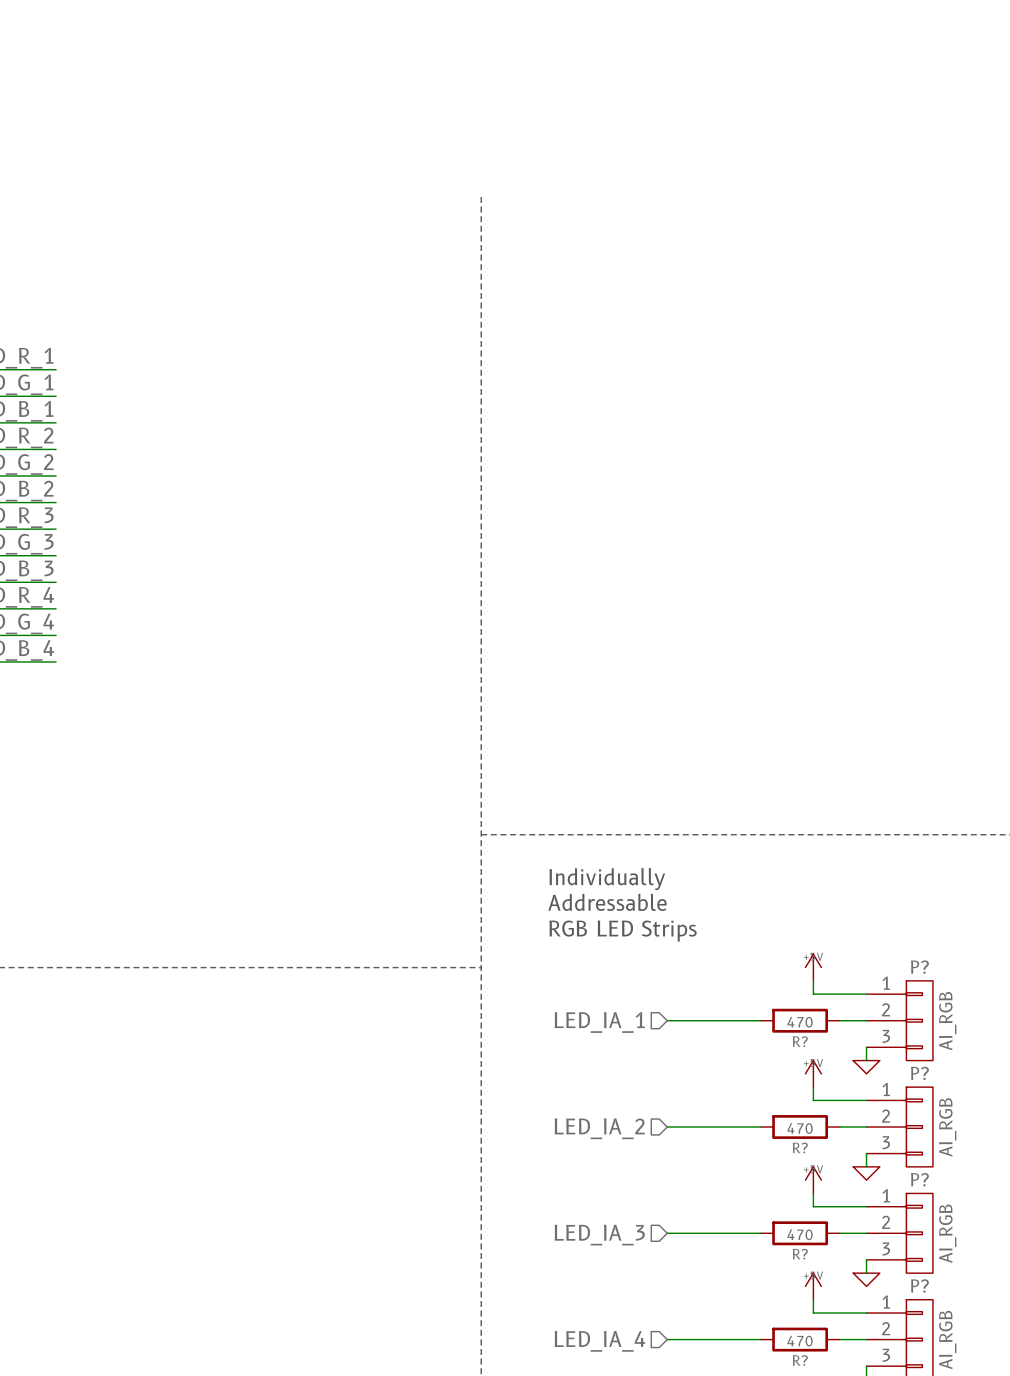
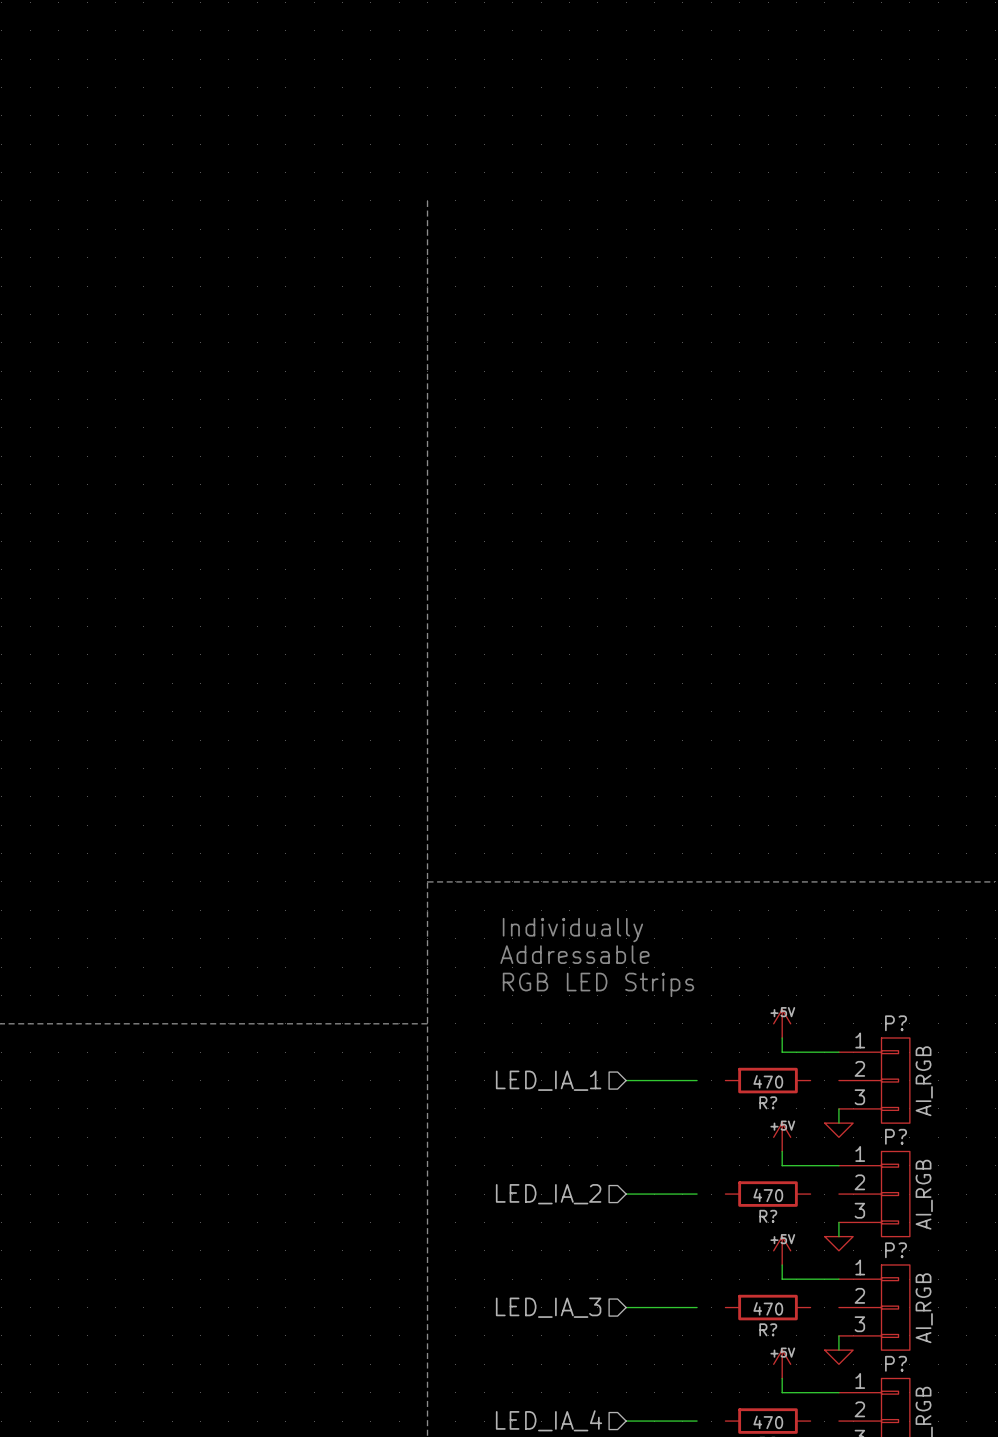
wire: (733, 1020) (760, 1020) -> none
wire: (839, 1020) (866, 1020) -> none
wire: (733, 1127) (760, 1127) -> none
wire: (839, 1127) (866, 1127) -> none
wire: (733, 1233) (760, 1233) -> none
wire: (839, 1233) (866, 1233) -> none
wire: (733, 1339) (760, 1339) -> none
wire: (839, 1339) (866, 1339) -> none

